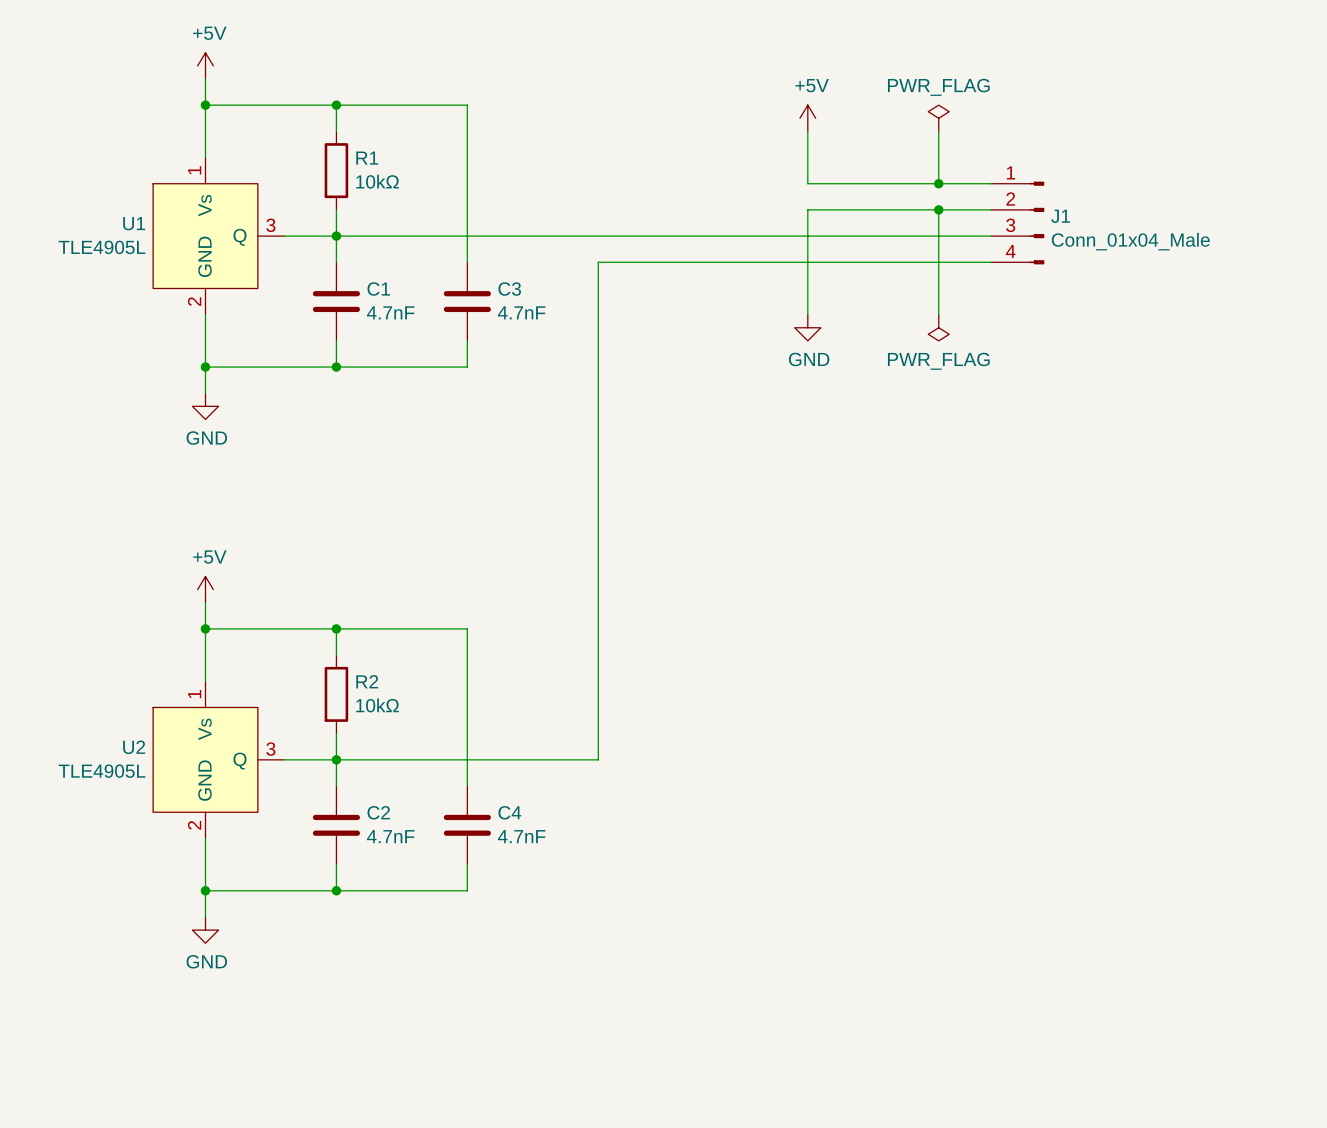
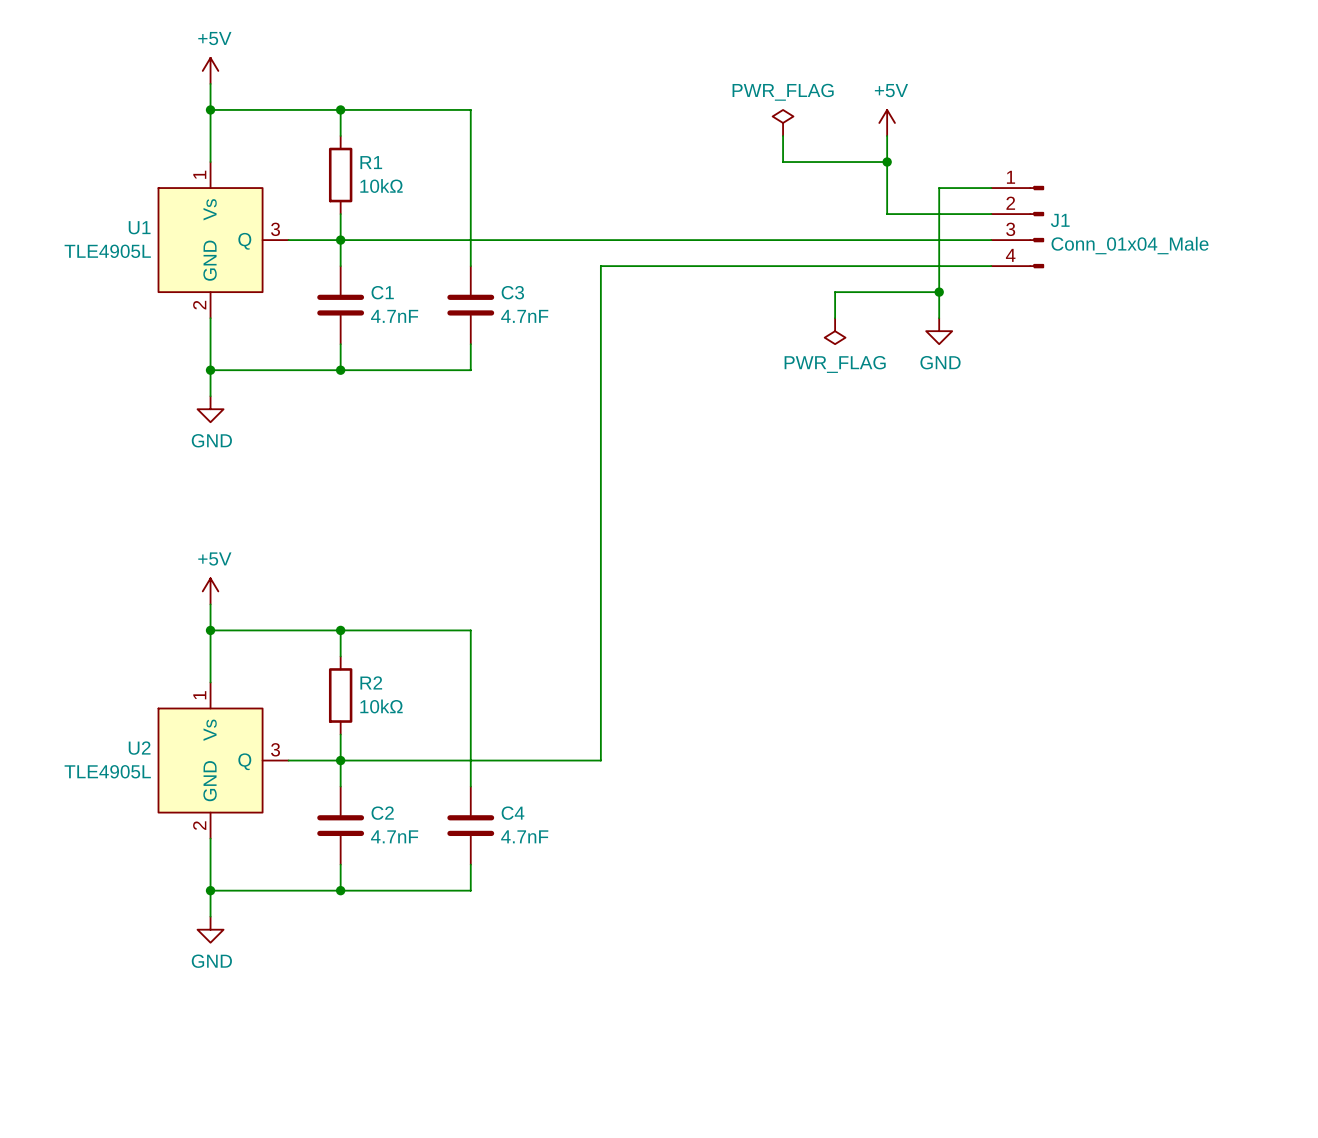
power symbol: none -> PWR_FLAG (783, 122)
power symbol position: +5V (807, 118) -> +5V (887, 122)
power symbol: PWR_FLAG (938, 118) -> none
wire: none -> (783, 135) (783, 162) (887, 162)
wire: (807, 131) (807, 183) (938, 183) (938, 131) -> none
junction: none -> (887, 162)
wire: none -> (939, 188) (939, 214)
junction: (938, 183) -> none
wire: (886, 209) (807, 209) (807, 314) -> (887, 214) (887, 135)
junction: (938, 209) -> none
wire: none -> (939, 292) (835, 292) (835, 318)
junction: none -> (939, 292)
power symbol: GND (807, 327) -> none
power symbol: none -> PWR_FLAG (835, 331)
power symbol: PWR_FLAG (938, 327) -> GND (939, 331)

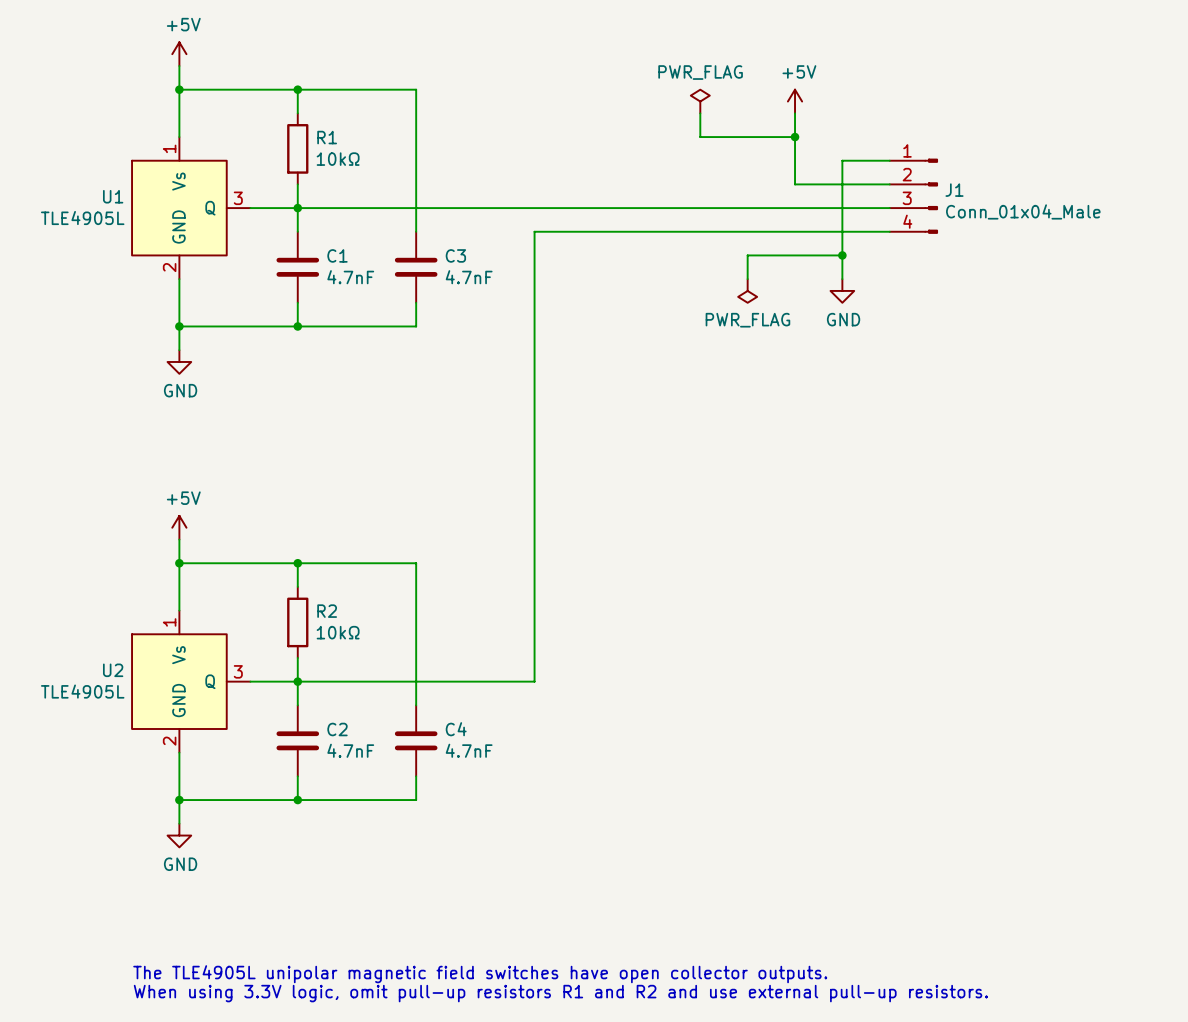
text: none -> The TLE4905L unipolar magnetic field switches have open collector outputs. (480, 974)
text: none -> When using 3.3V logic, omit pull-up resistors R1 and R2 and use external pull-up resistors. (560, 993)

